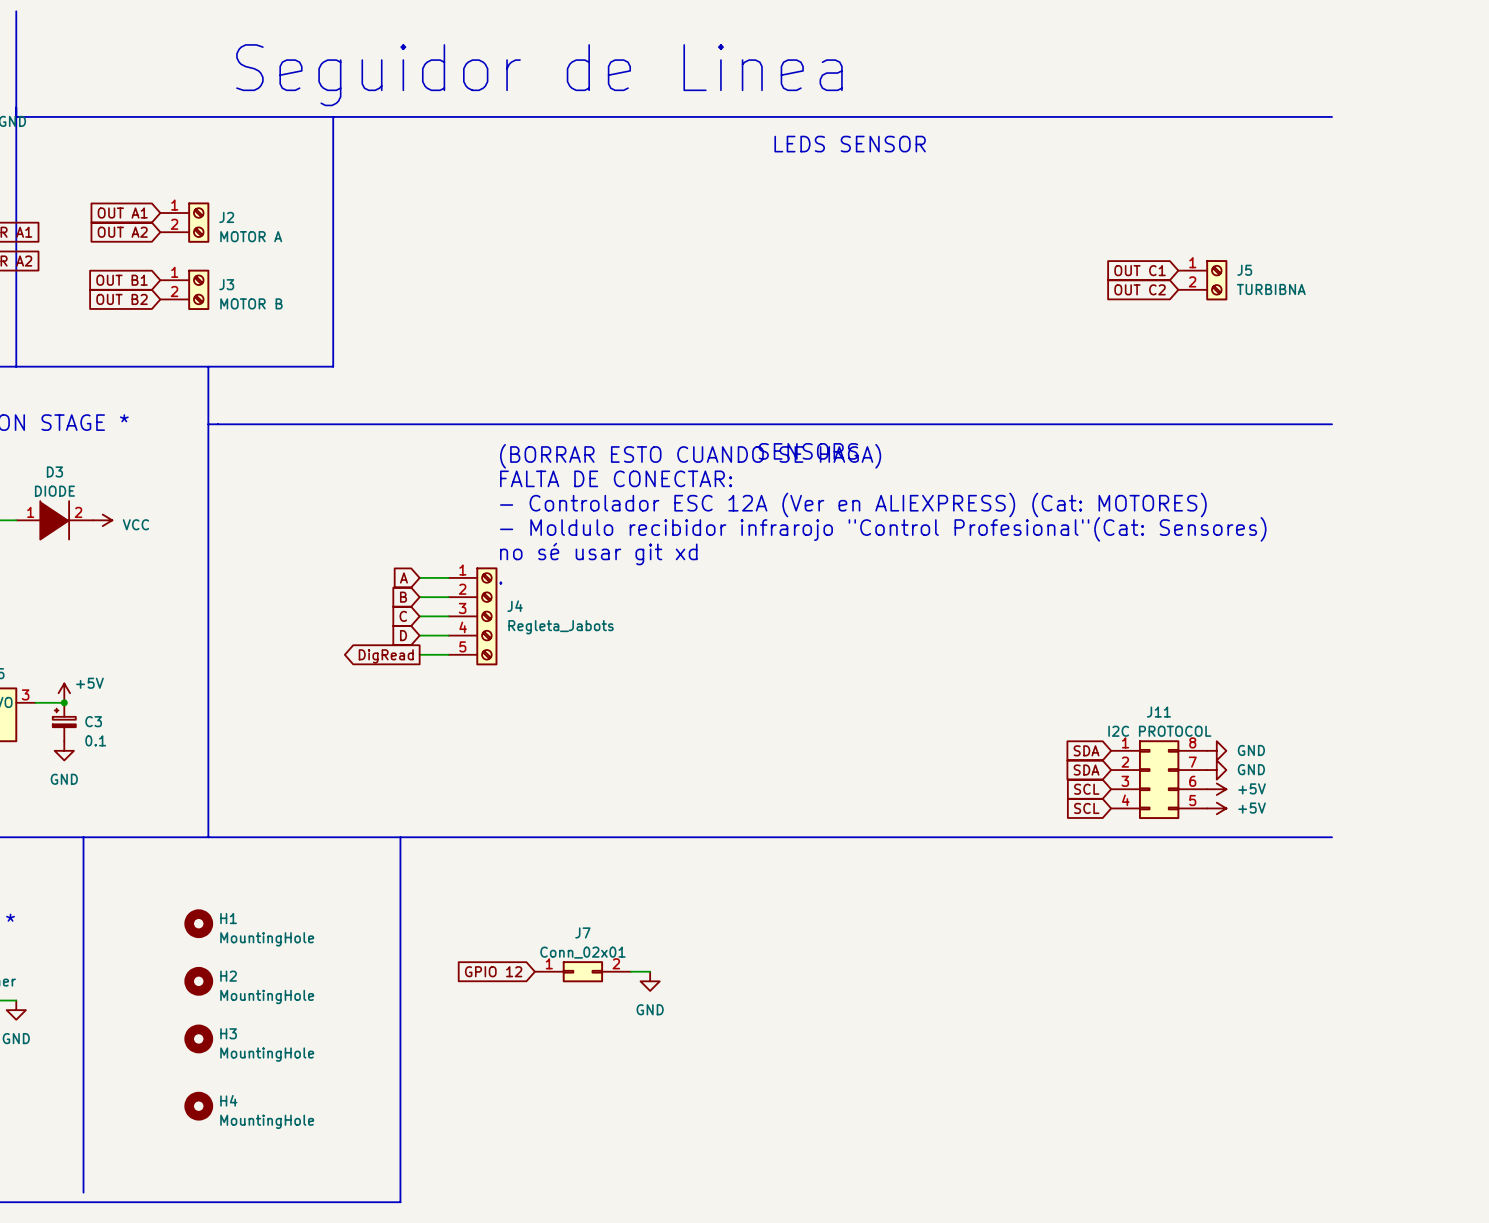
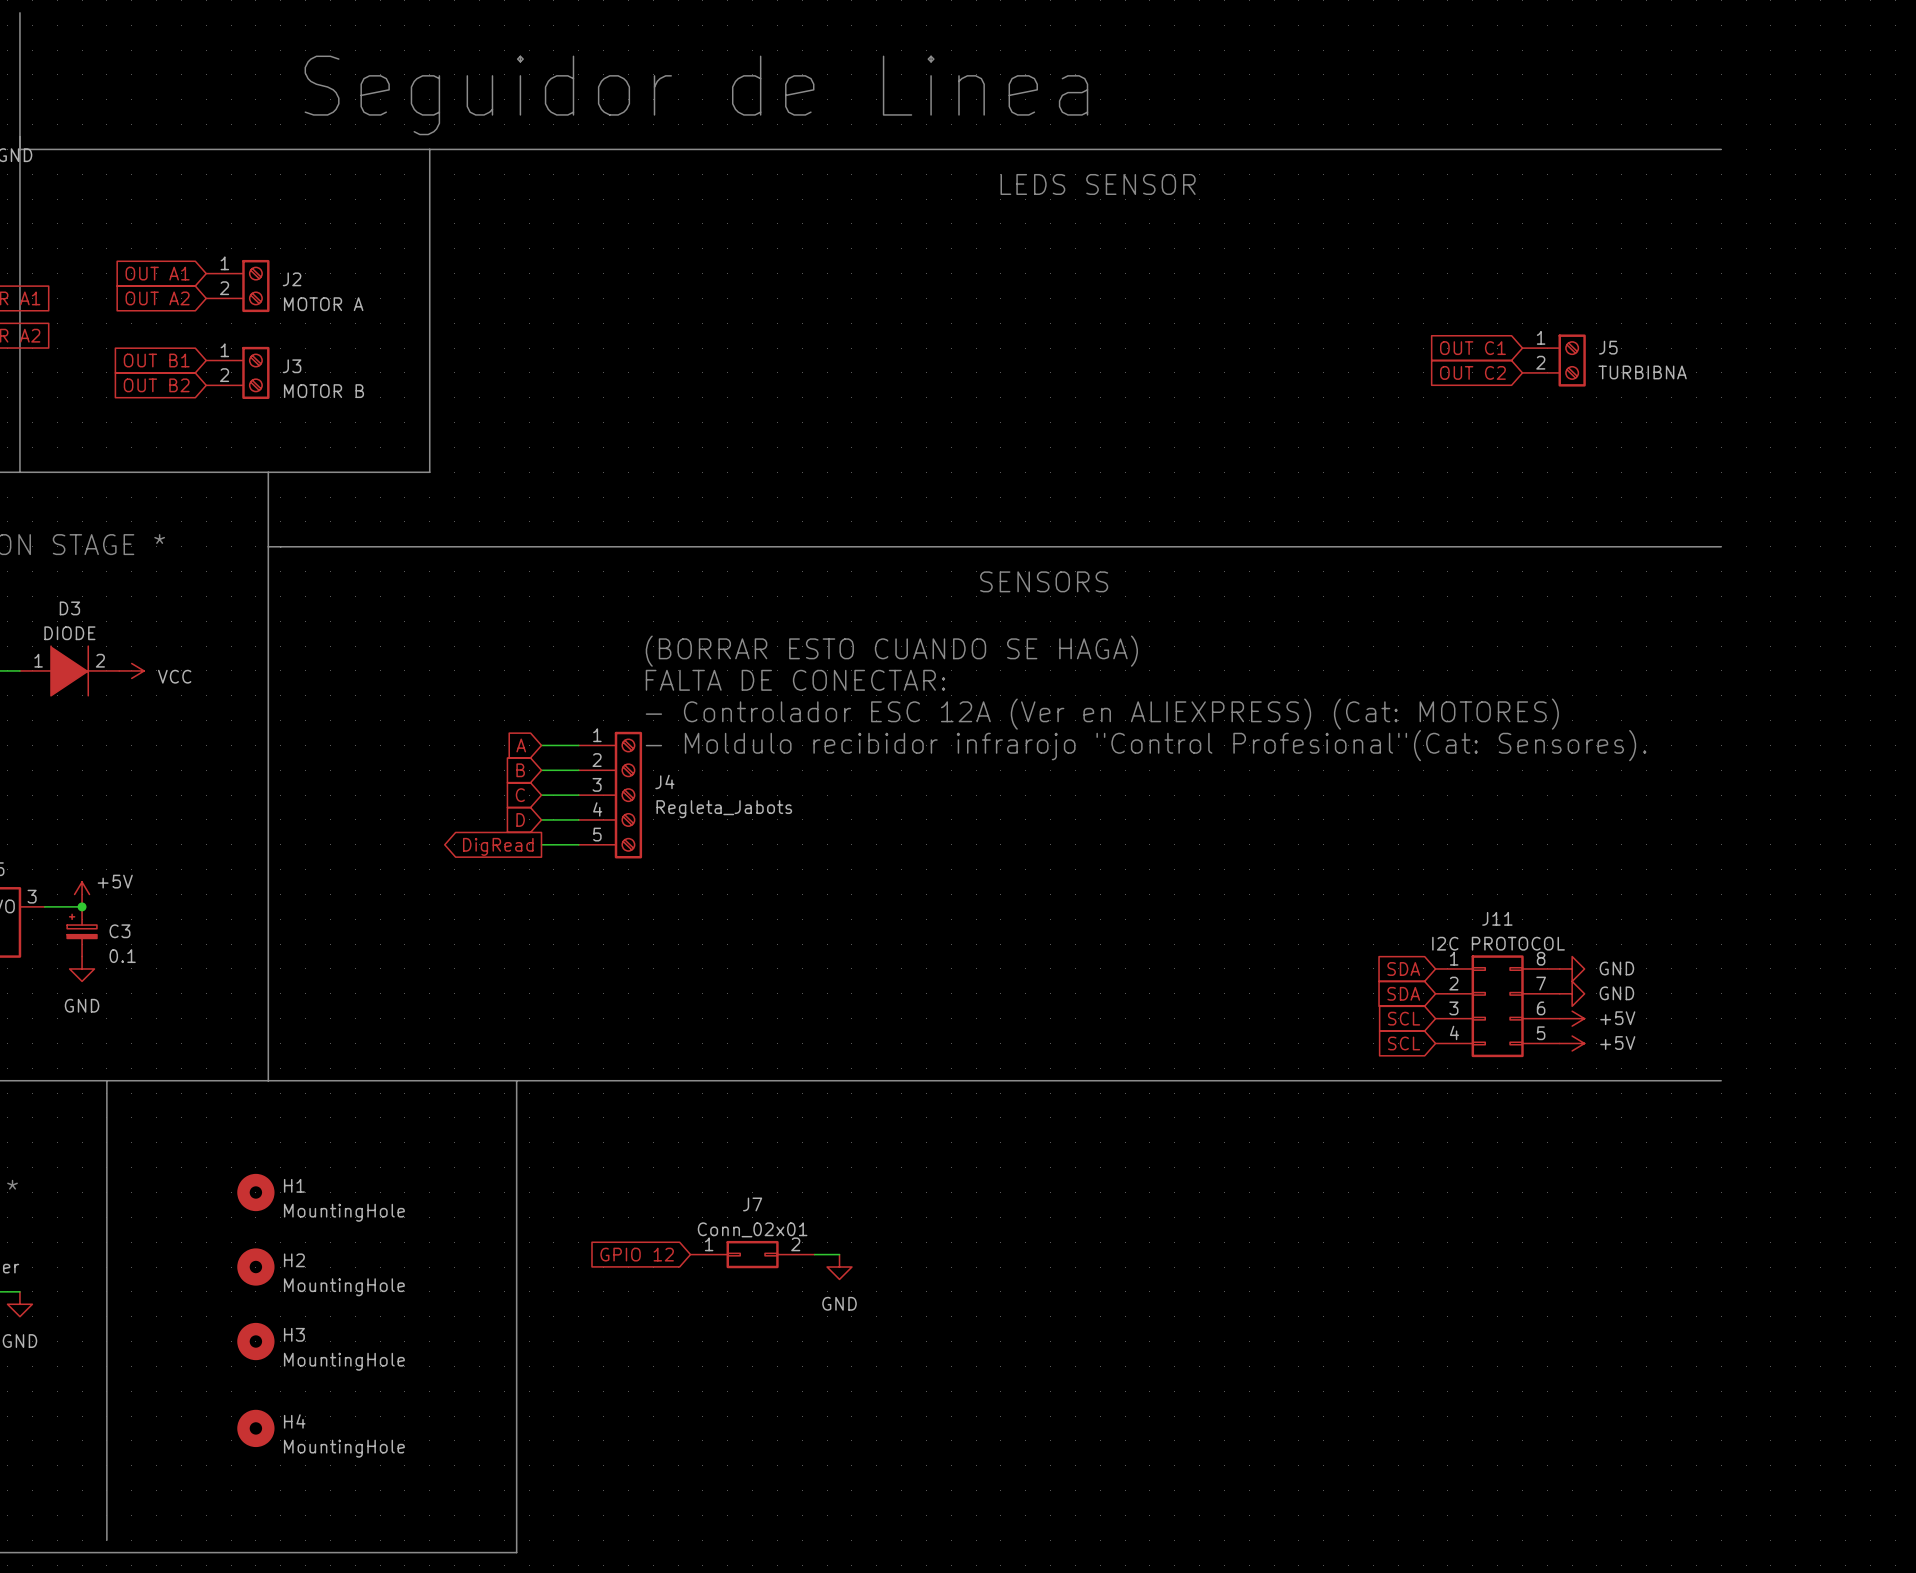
text: (BORRAR ESTO CUANDO SE HAGA) (690, 456) -> none
text: FALTA DE CONECTAR: (616, 478) -> none
text: - Controlador ESC 12A (Ver en ALIEXPRESS) (Cat: MOTORES) (853, 505) -> (BORRAR ESTO CUANDO SE HAGA) (891, 651)
text: - Moldulo recibidor infrarojo "Control Profesional"(Cat: Sensores) (883, 529) -> FALTA DE CONECTAR: (795, 680)
text: no sé usar git xd (598, 554) -> - Controlador ESC 12A (Ver en ALIEXPRESS) (Cat: MOTORES) (1102, 714)
text: . (500, 583) -> - Moldulo recibidor infrarojo "Control Profesional"(Cat: Sensores). (1146, 745)

